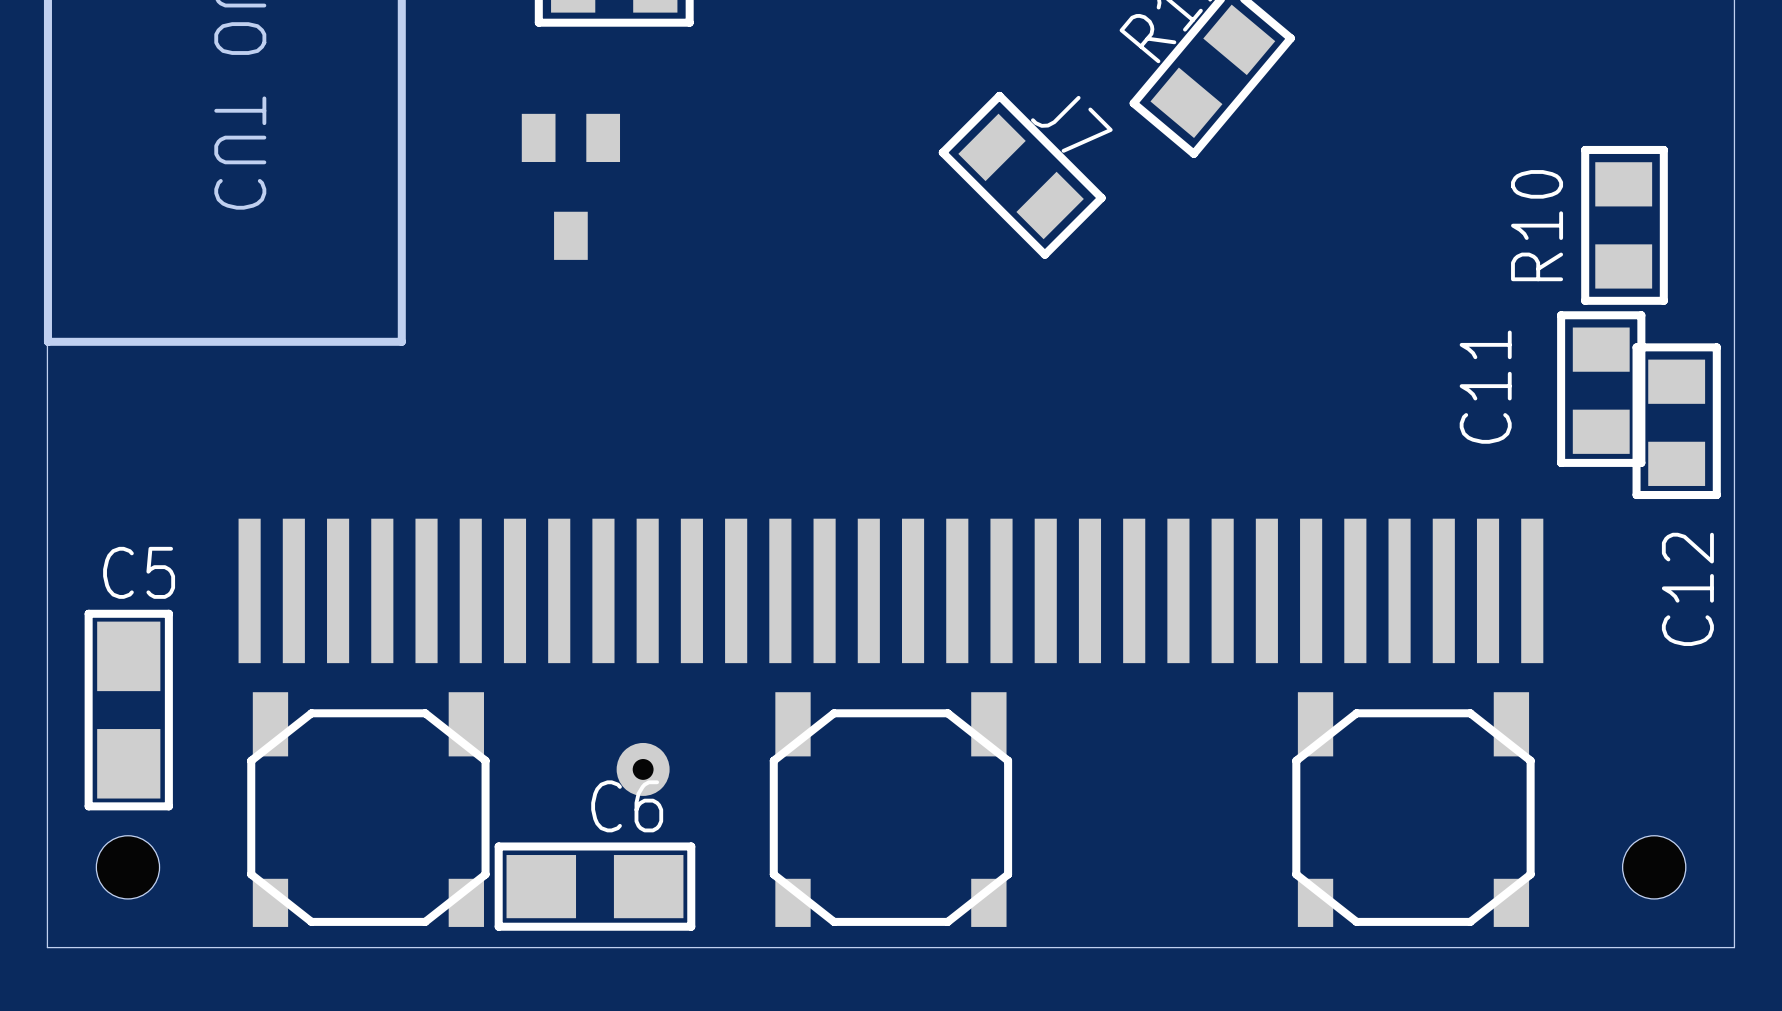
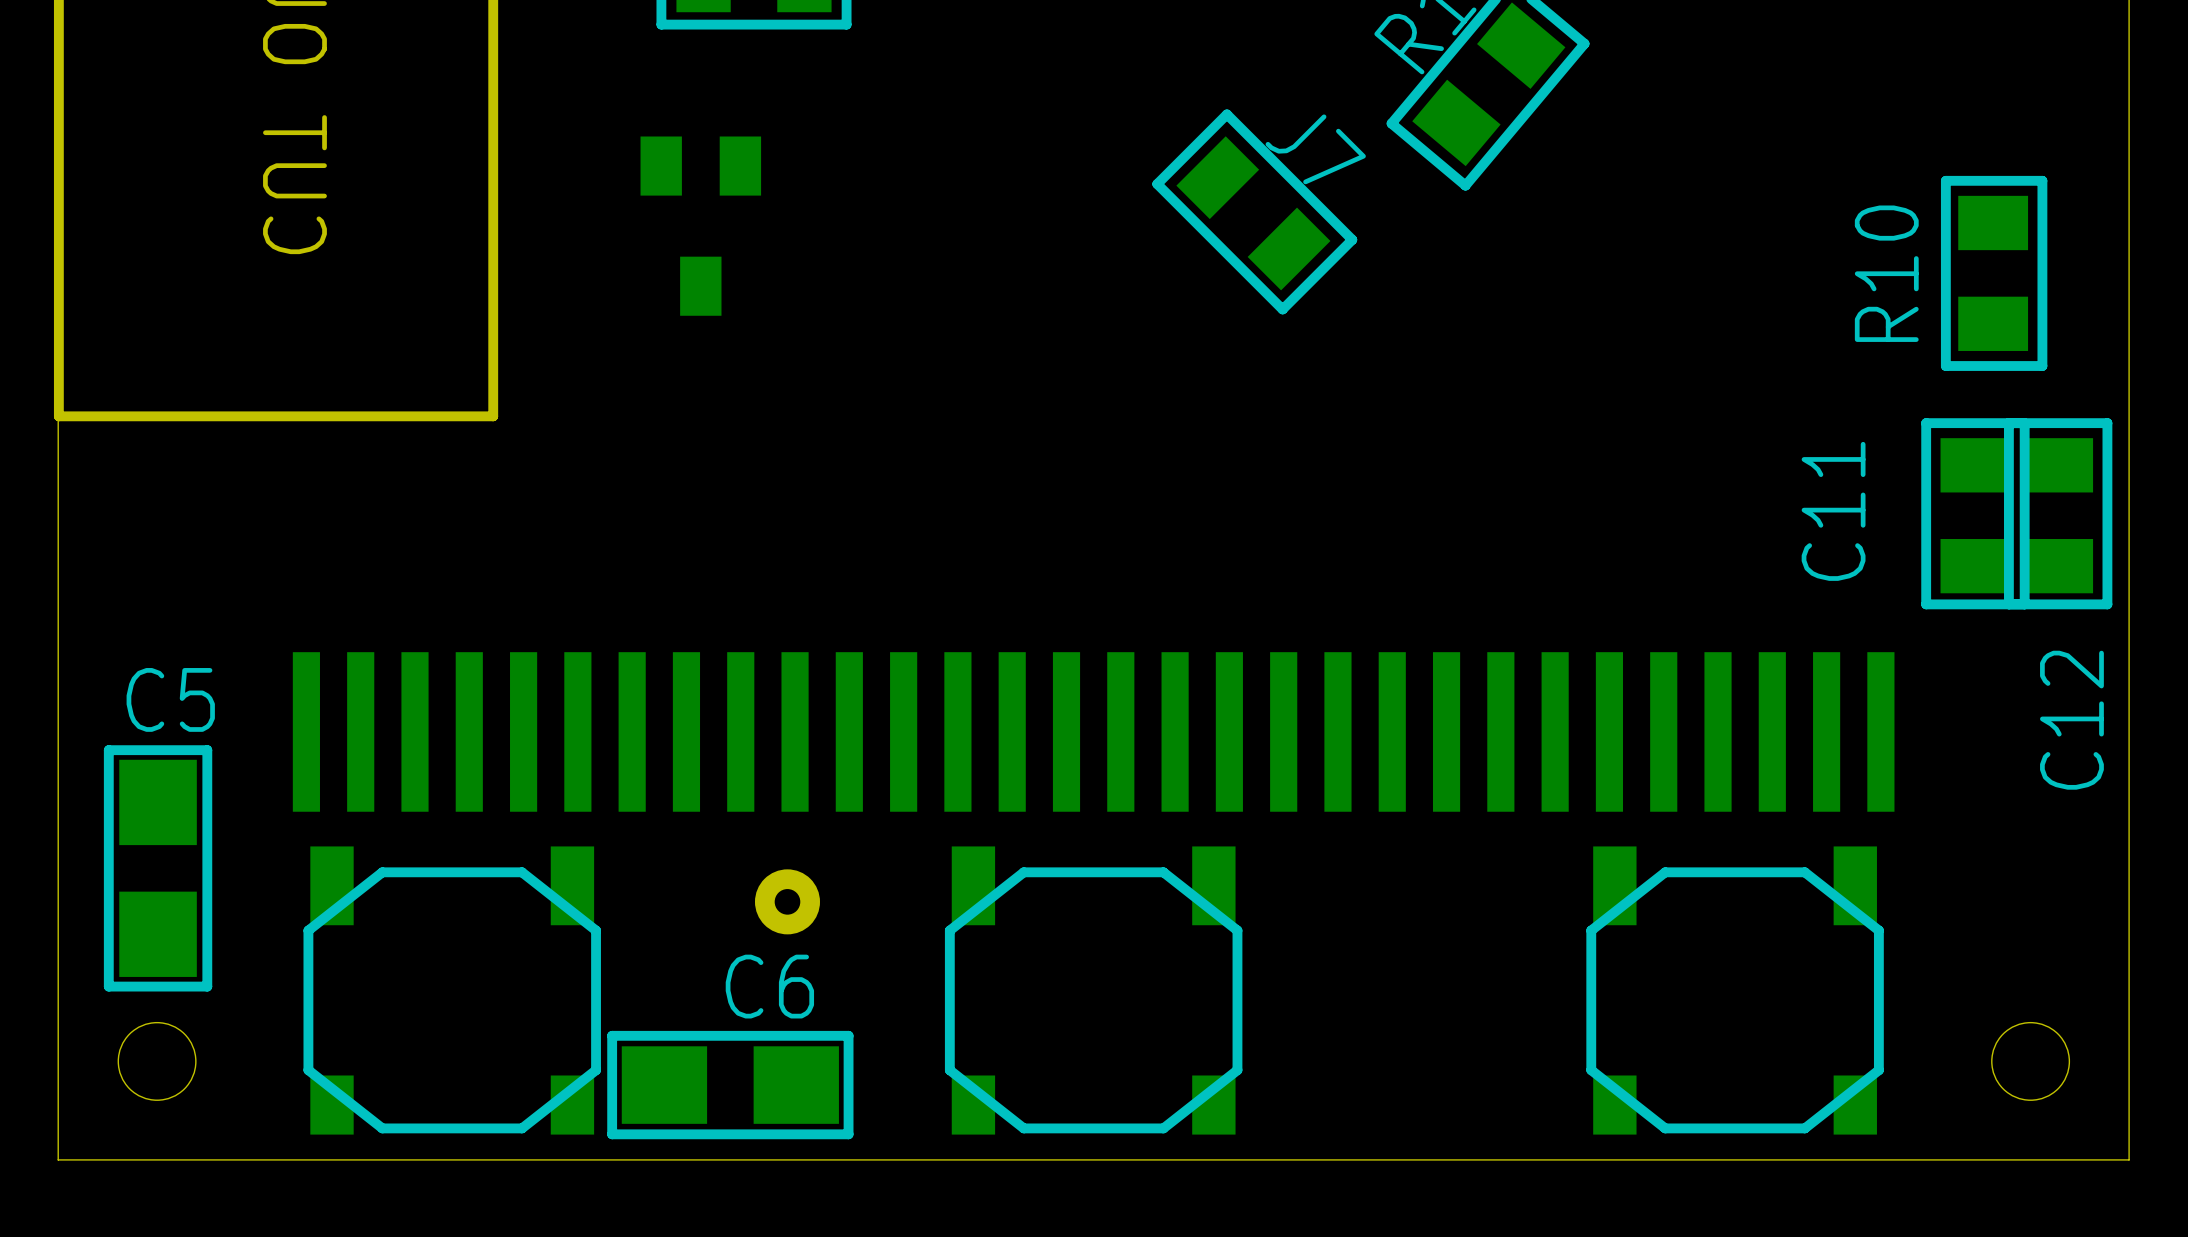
C11 position: (1601, 389) -> (1975, 513)
part footprint: [238, 518, 1544, 664] -> [292, 652, 1895, 812]
part position: (643, 769) -> (787, 901)

